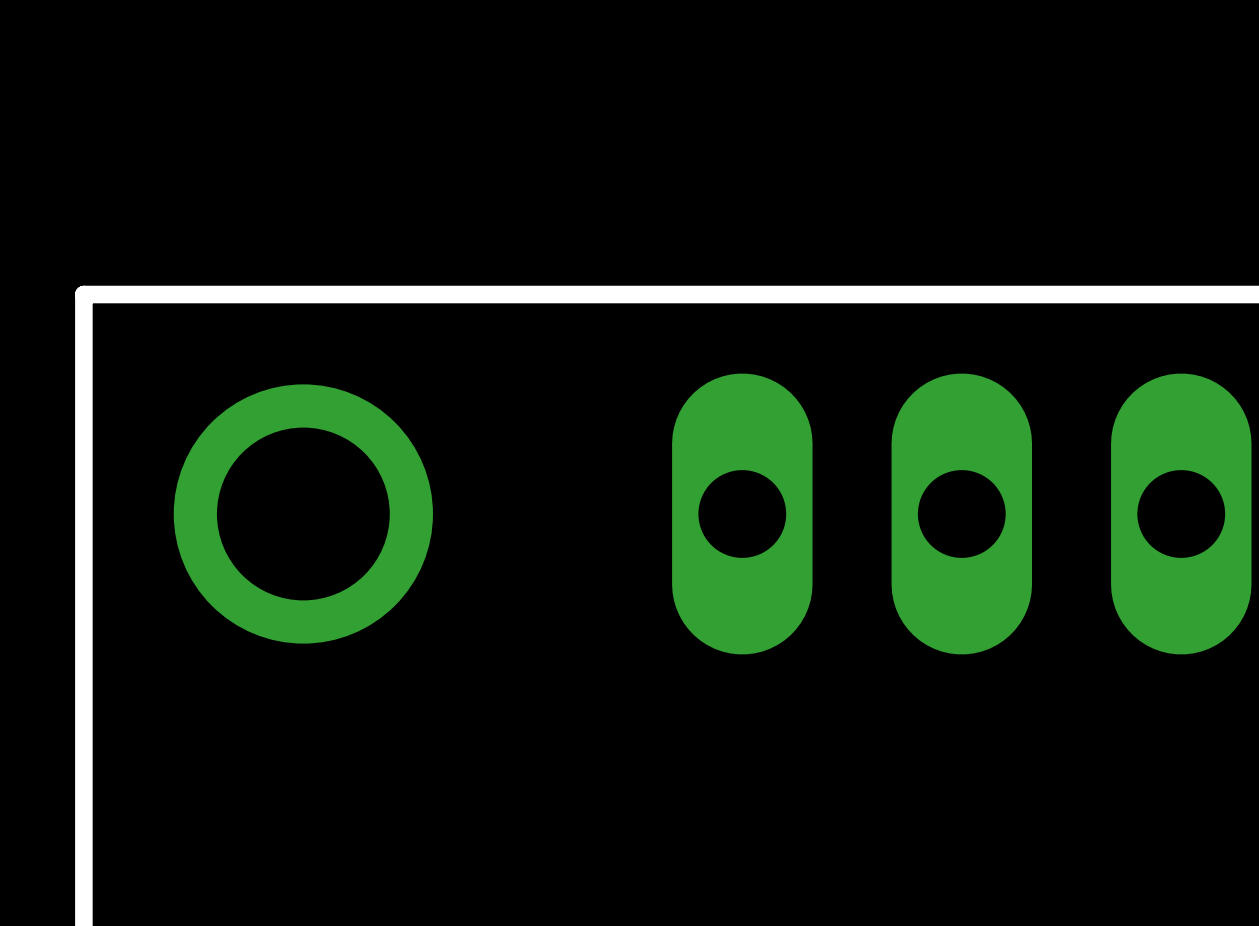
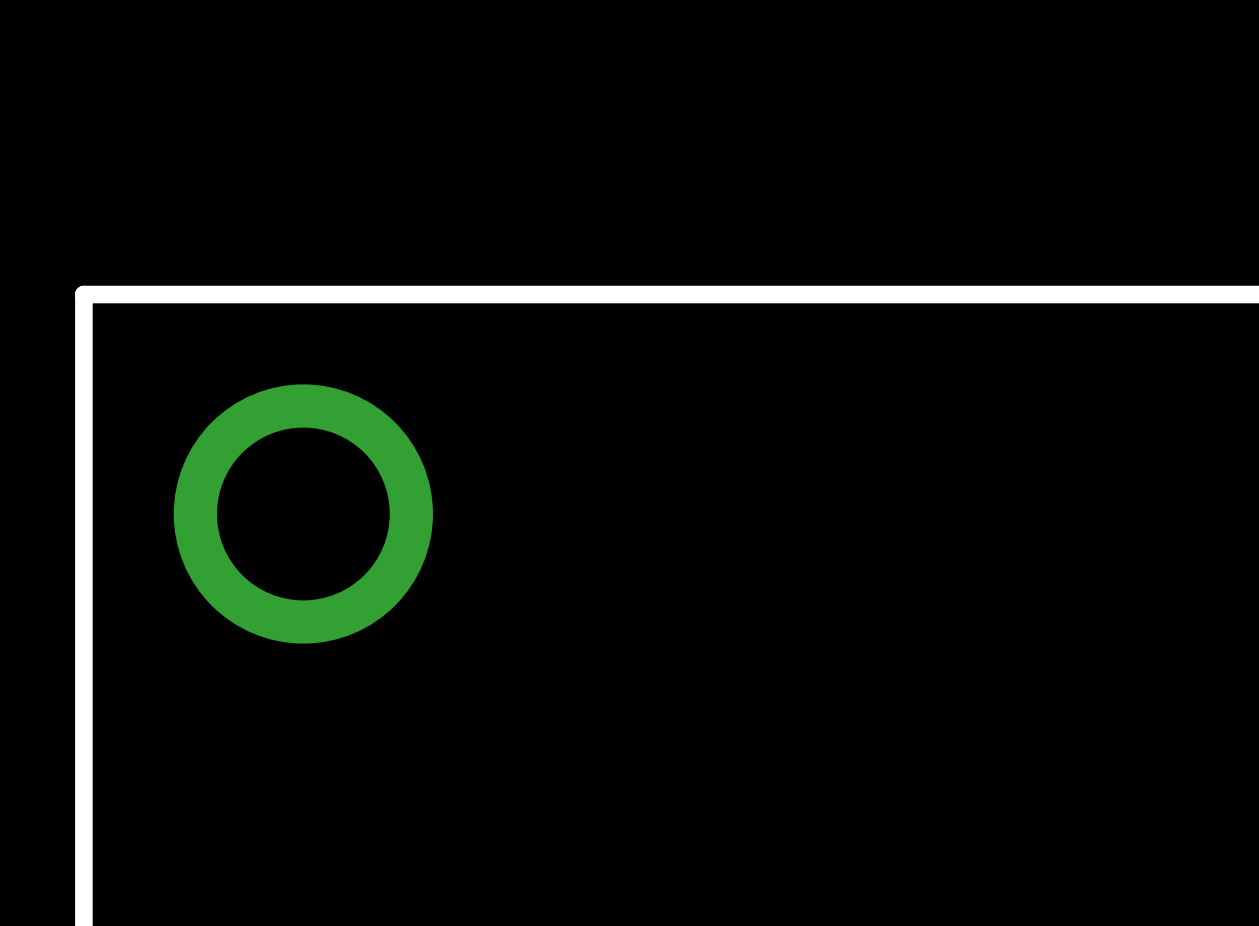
part: (961, 513) -> none

